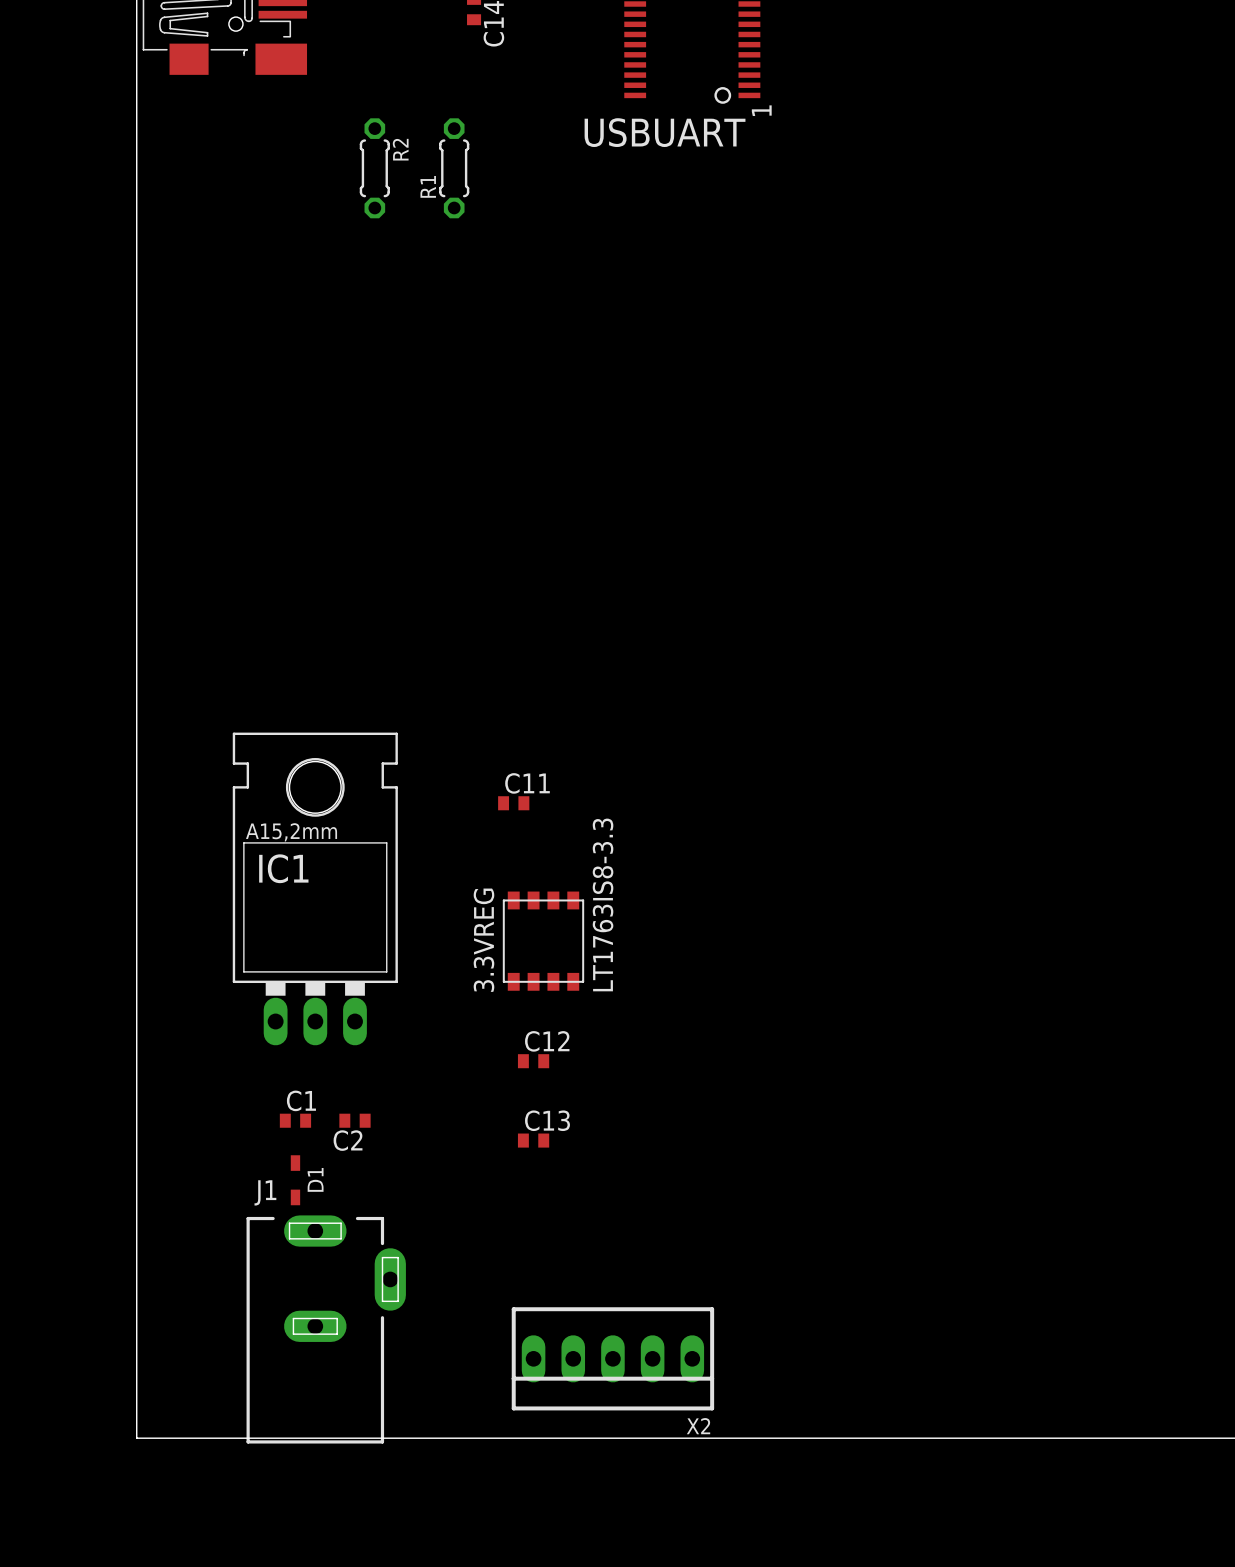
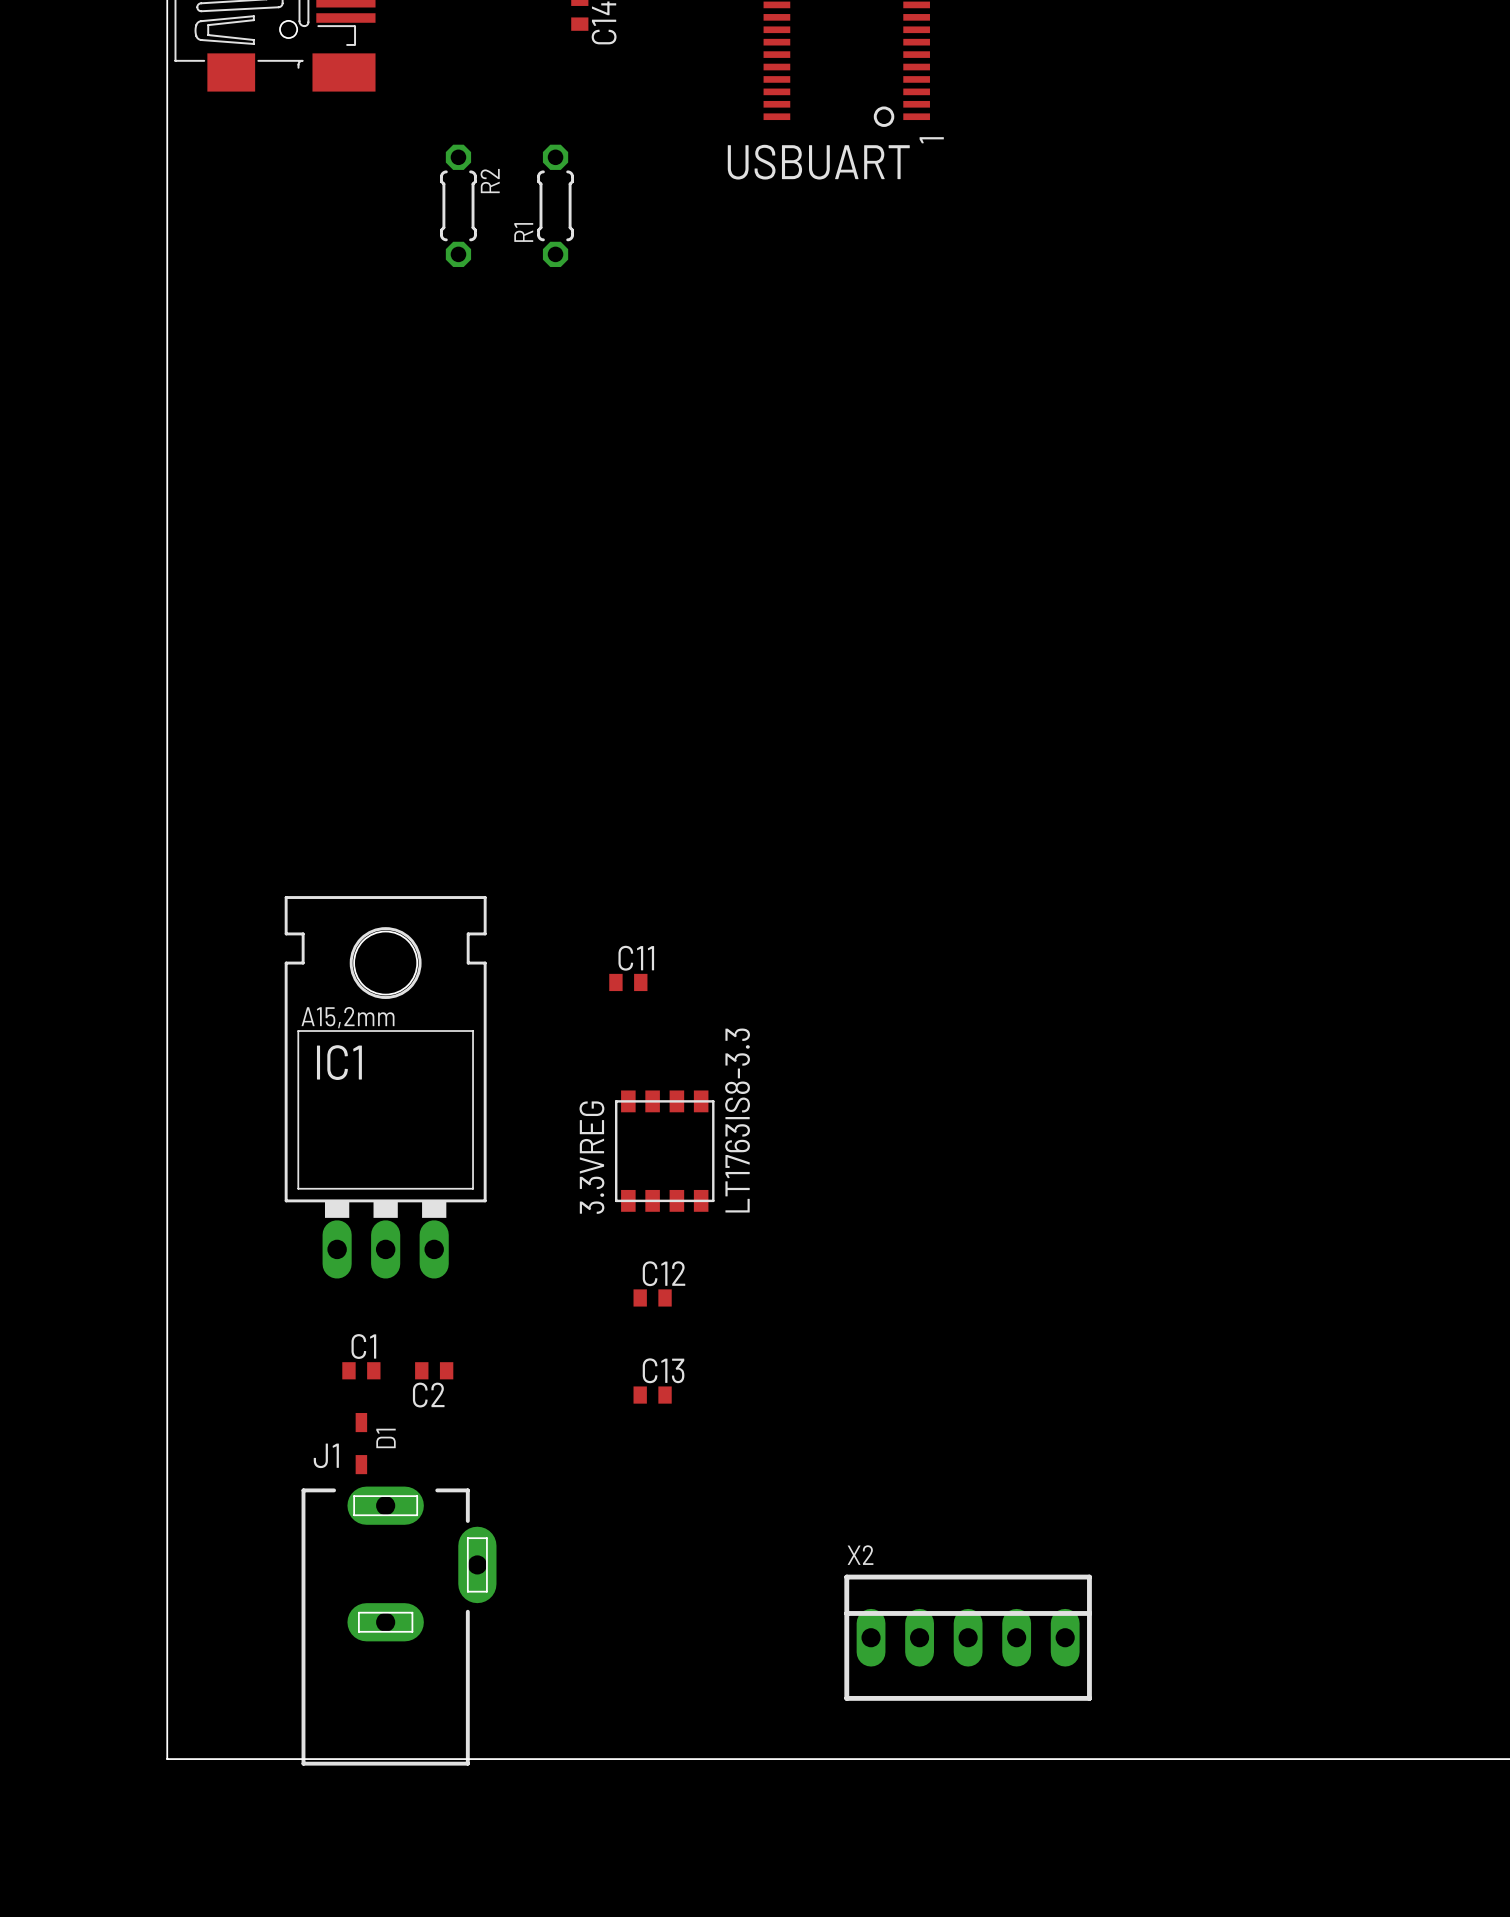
X2 rotation: 0° (612, 1358) -> 180° (968, 1637)
X2 position: (612, 1358) -> (968, 1637)

